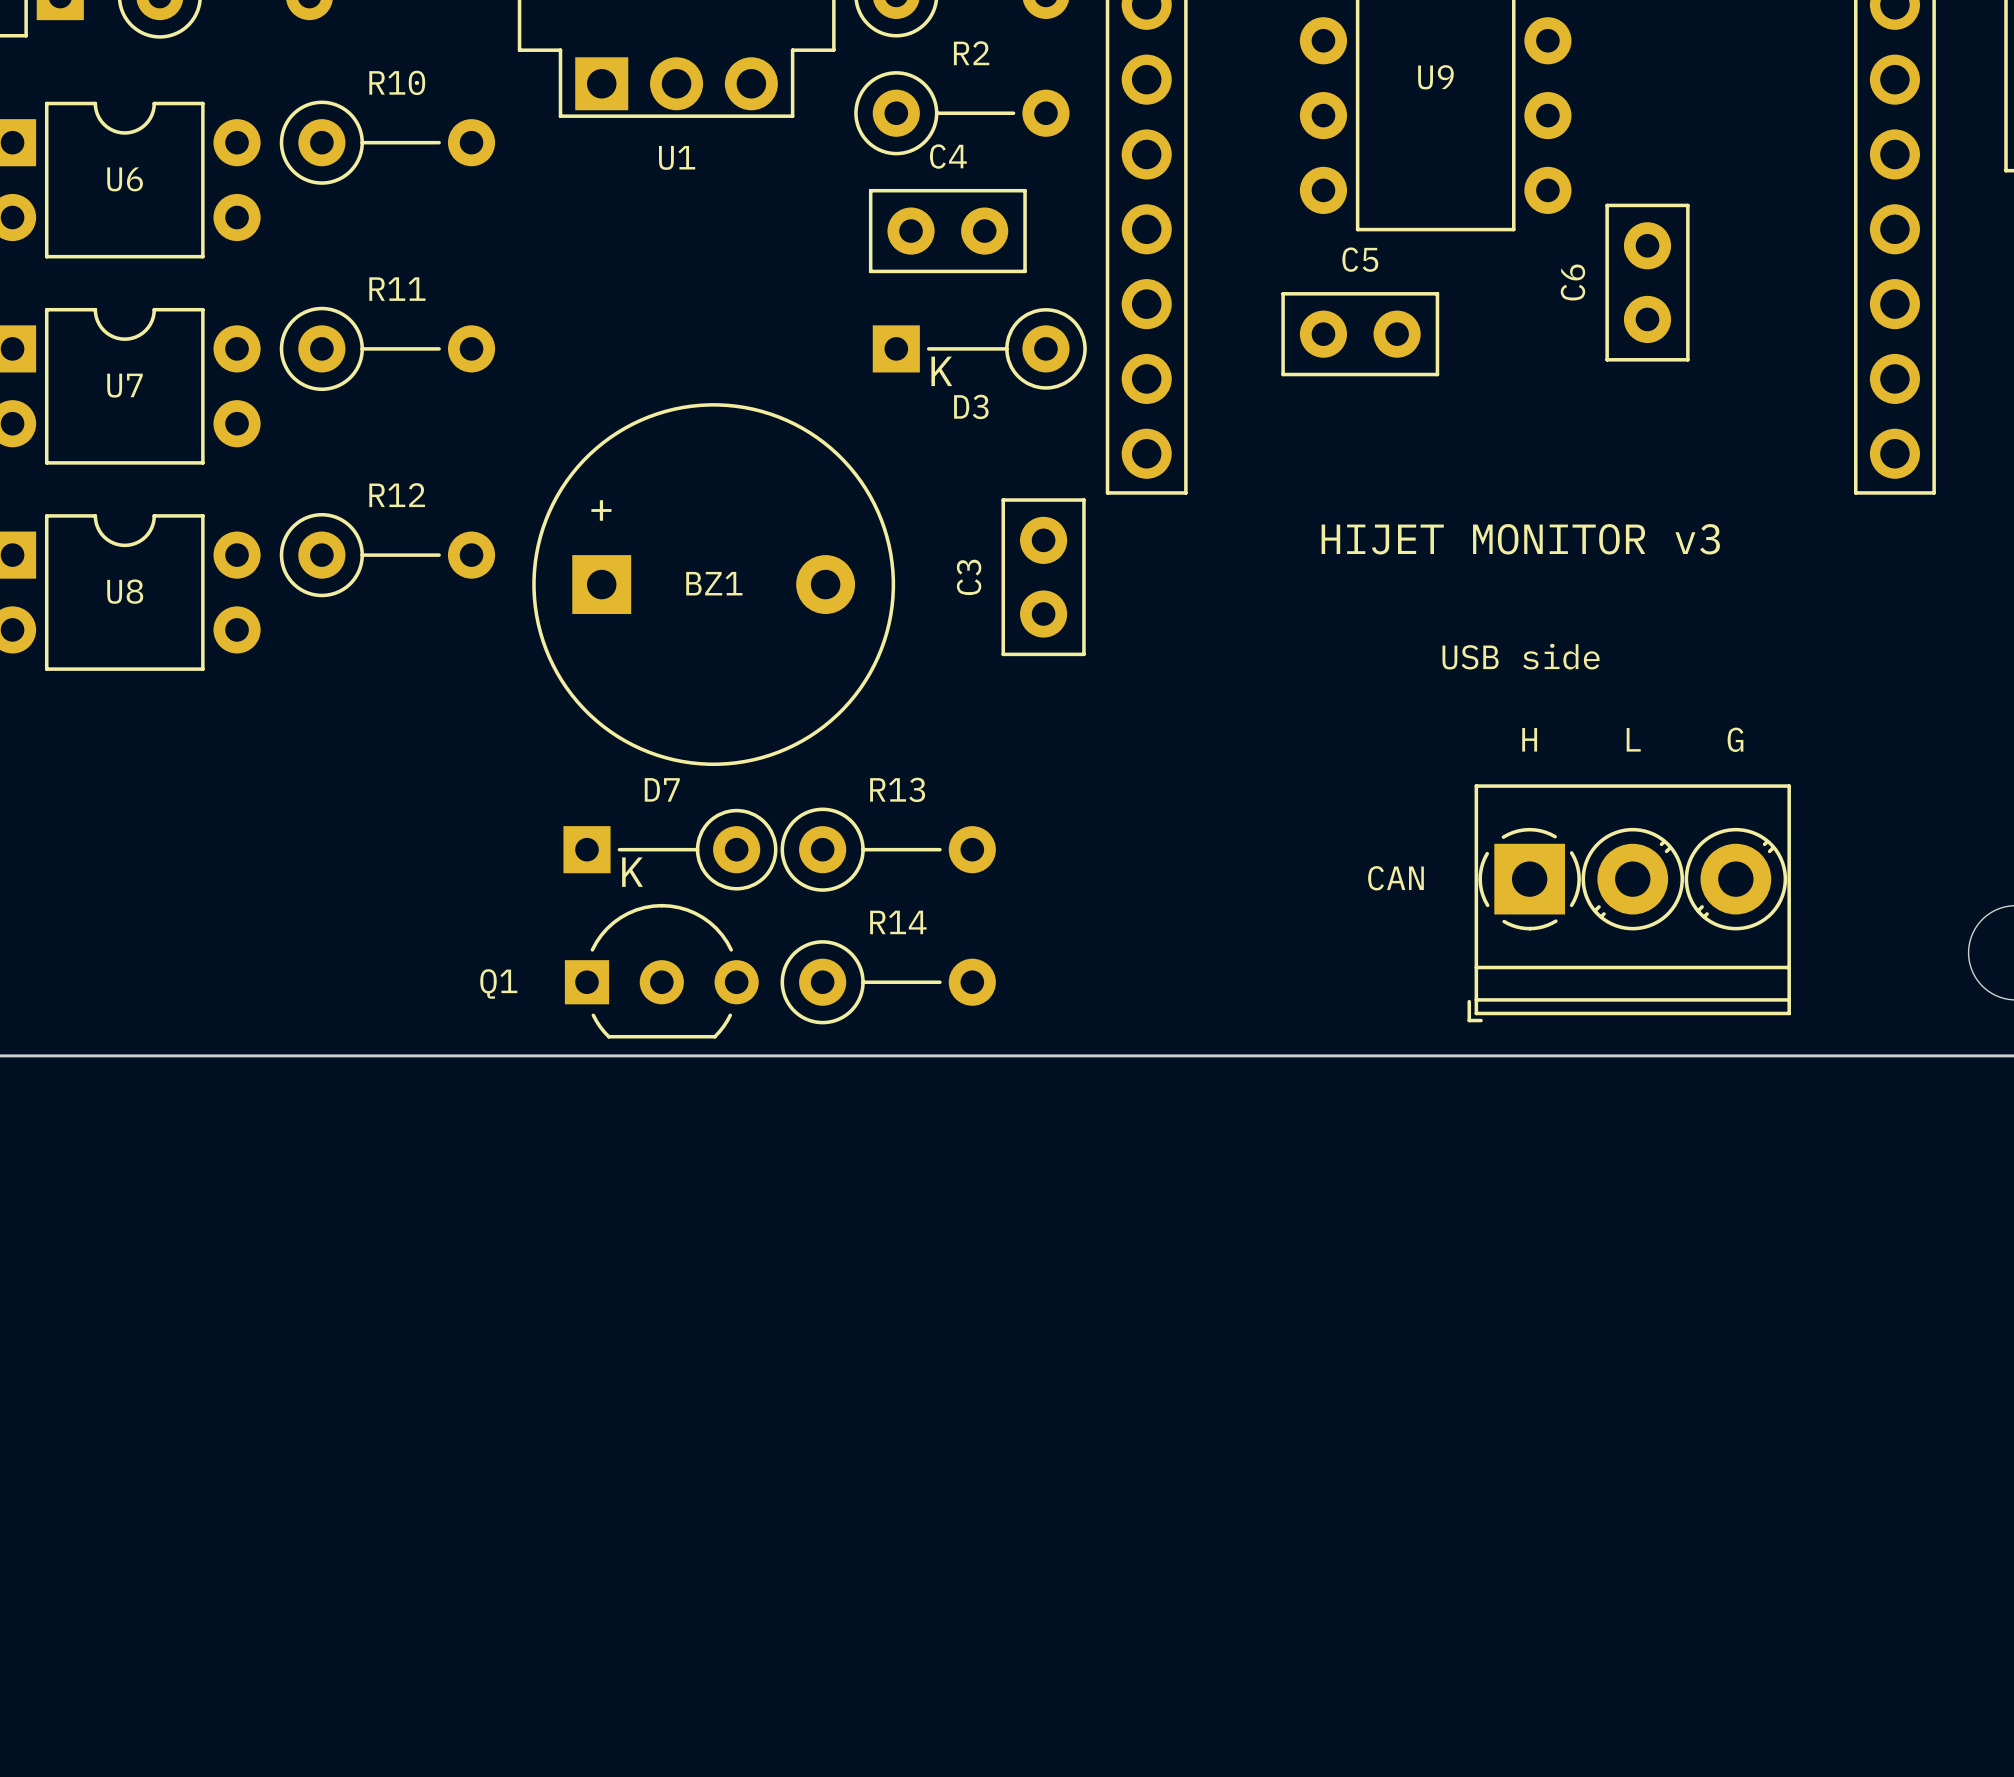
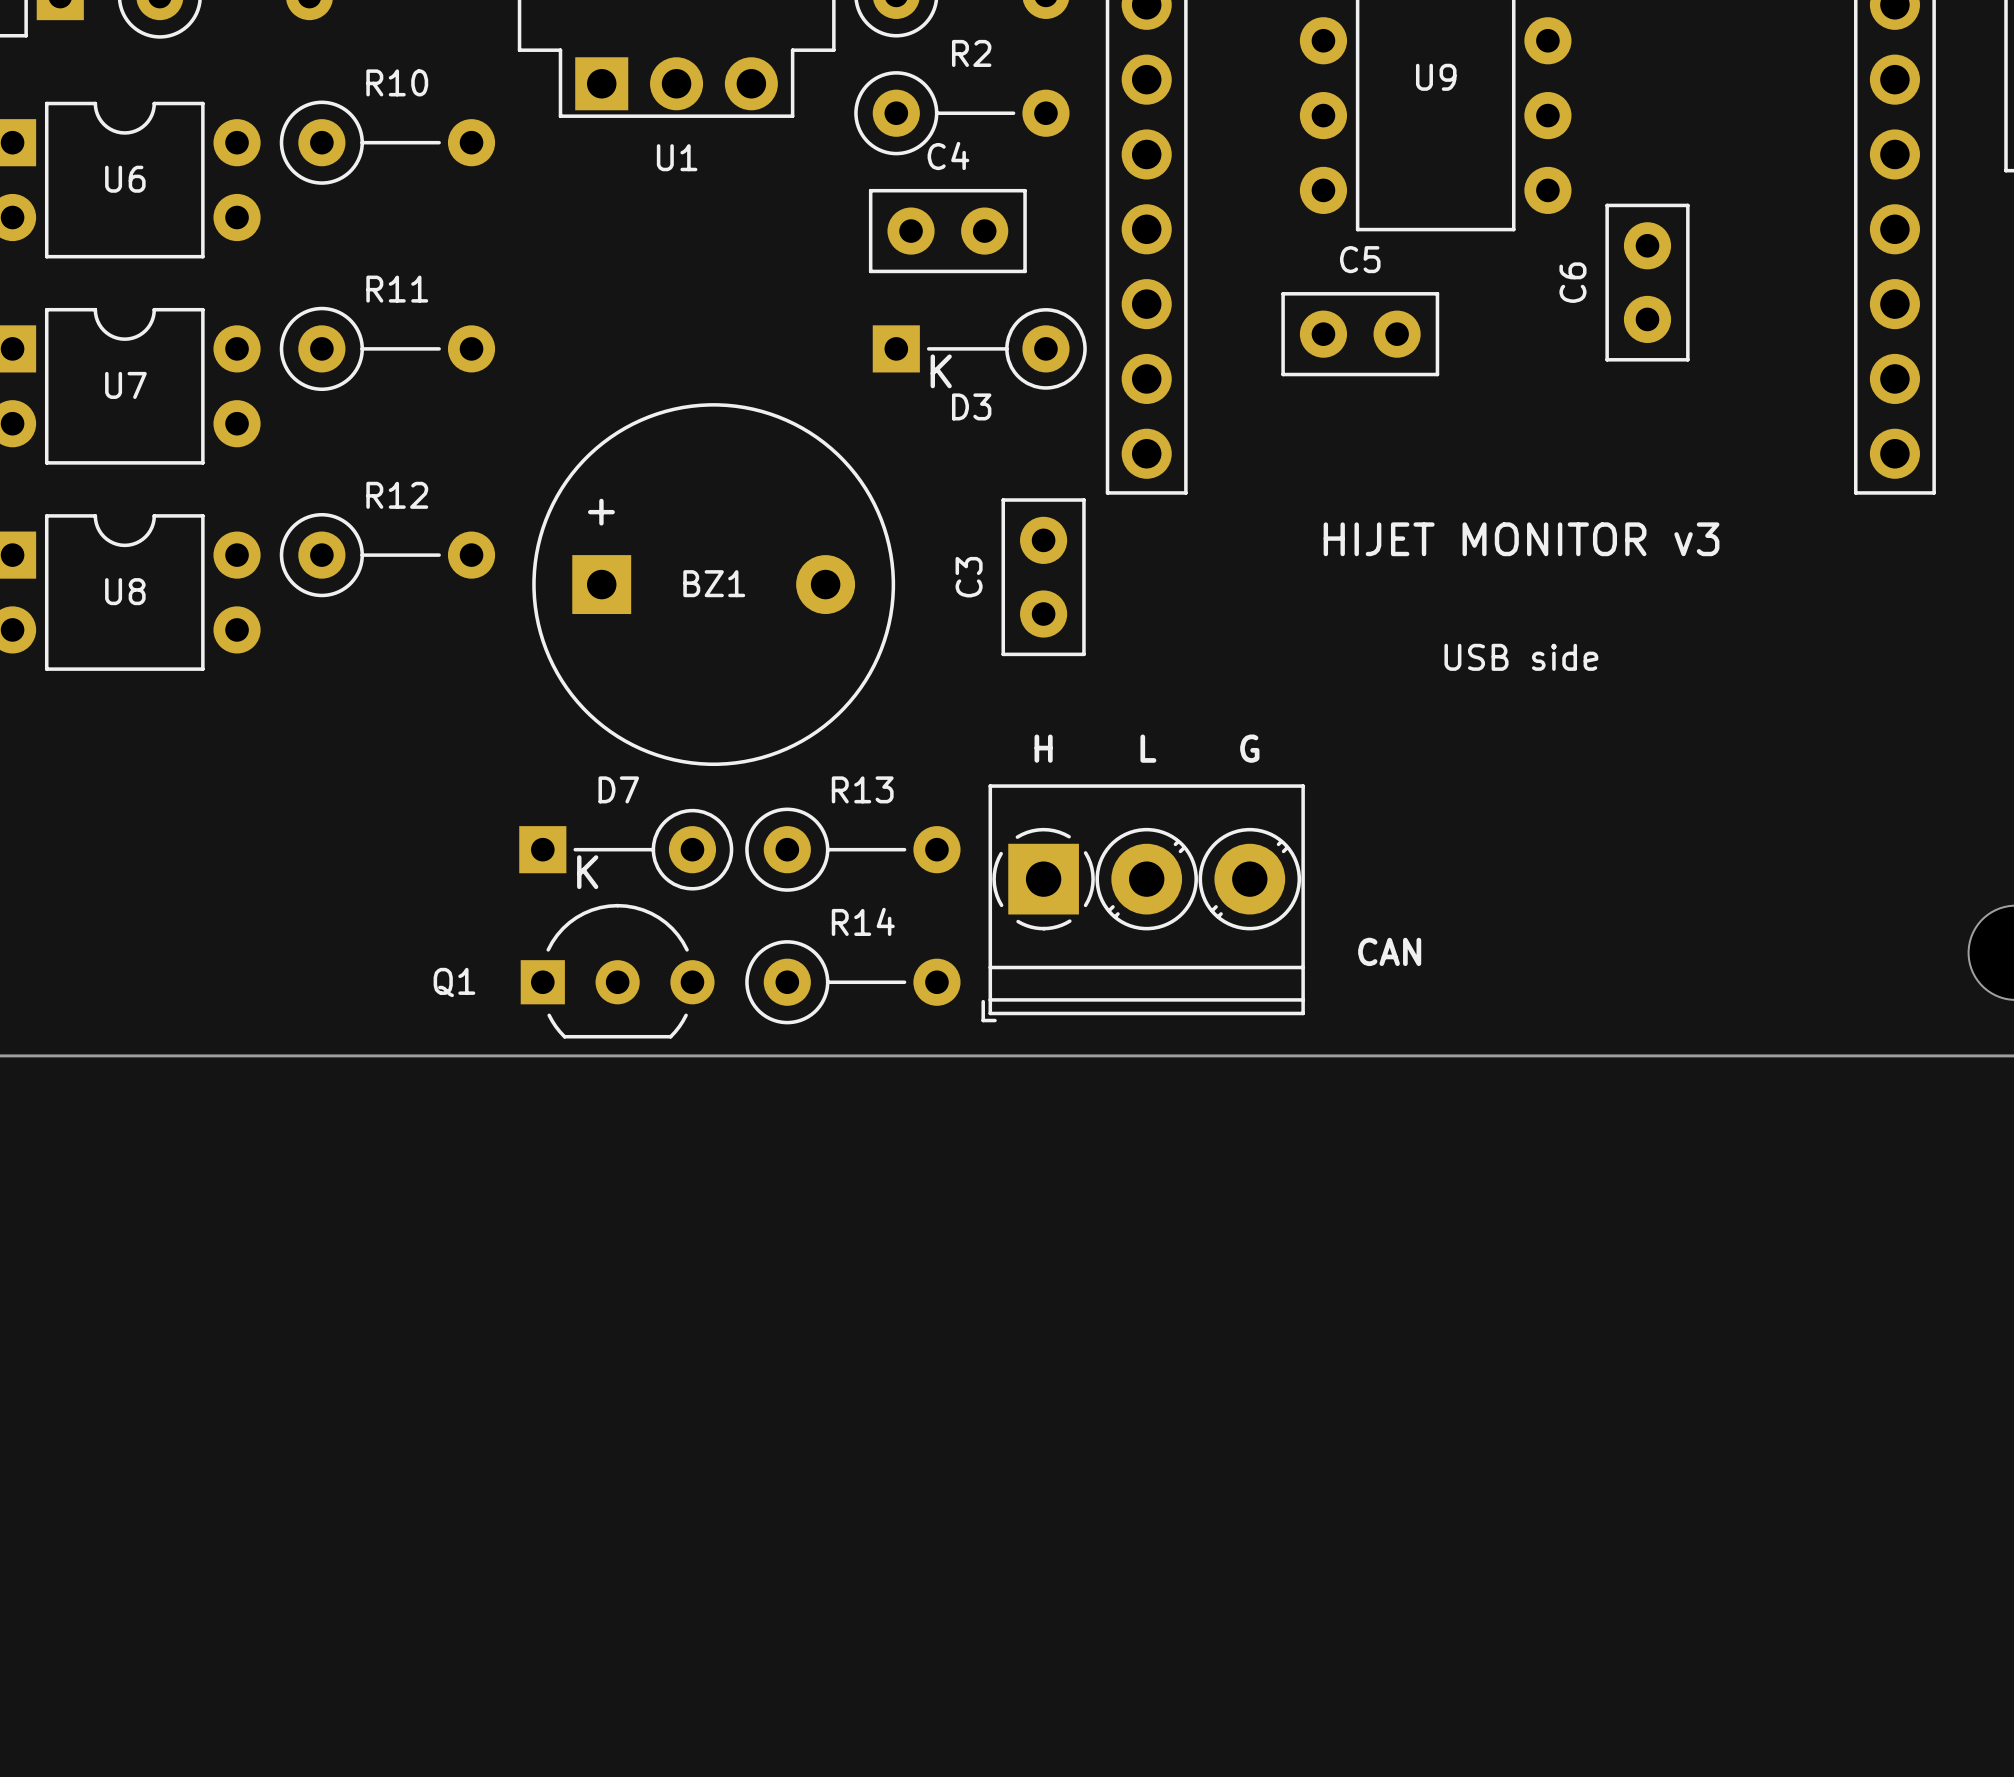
text position: H (1529, 739) -> H (1043, 748)
text position: L (1633, 739) -> L (1148, 748)
text position: G (1735, 739) -> G (1249, 748)
D7 position: (670, 849) -> (626, 849)
R13 position: (888, 849) -> (852, 849)
text position: CAN (1396, 878) -> CAN (1389, 951)
part position: (1629, 903) -> (1143, 903)
Q1 position: (661, 971) -> (617, 971)
R14 position: (888, 982) -> (852, 982)

